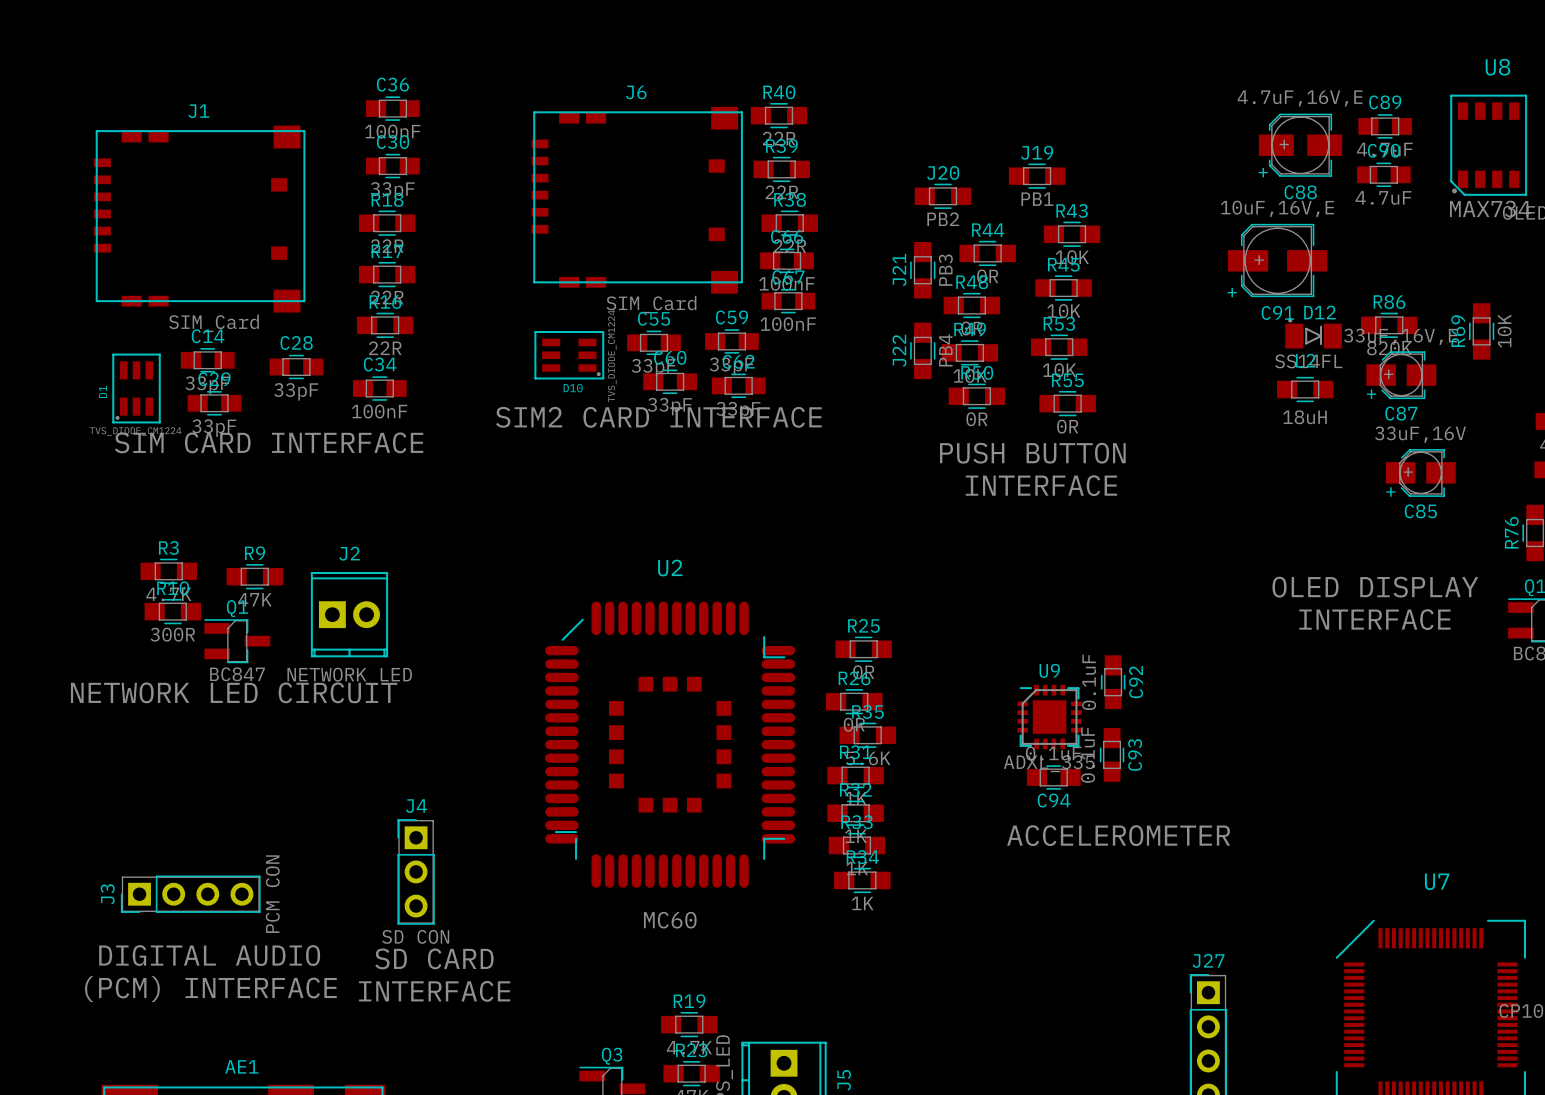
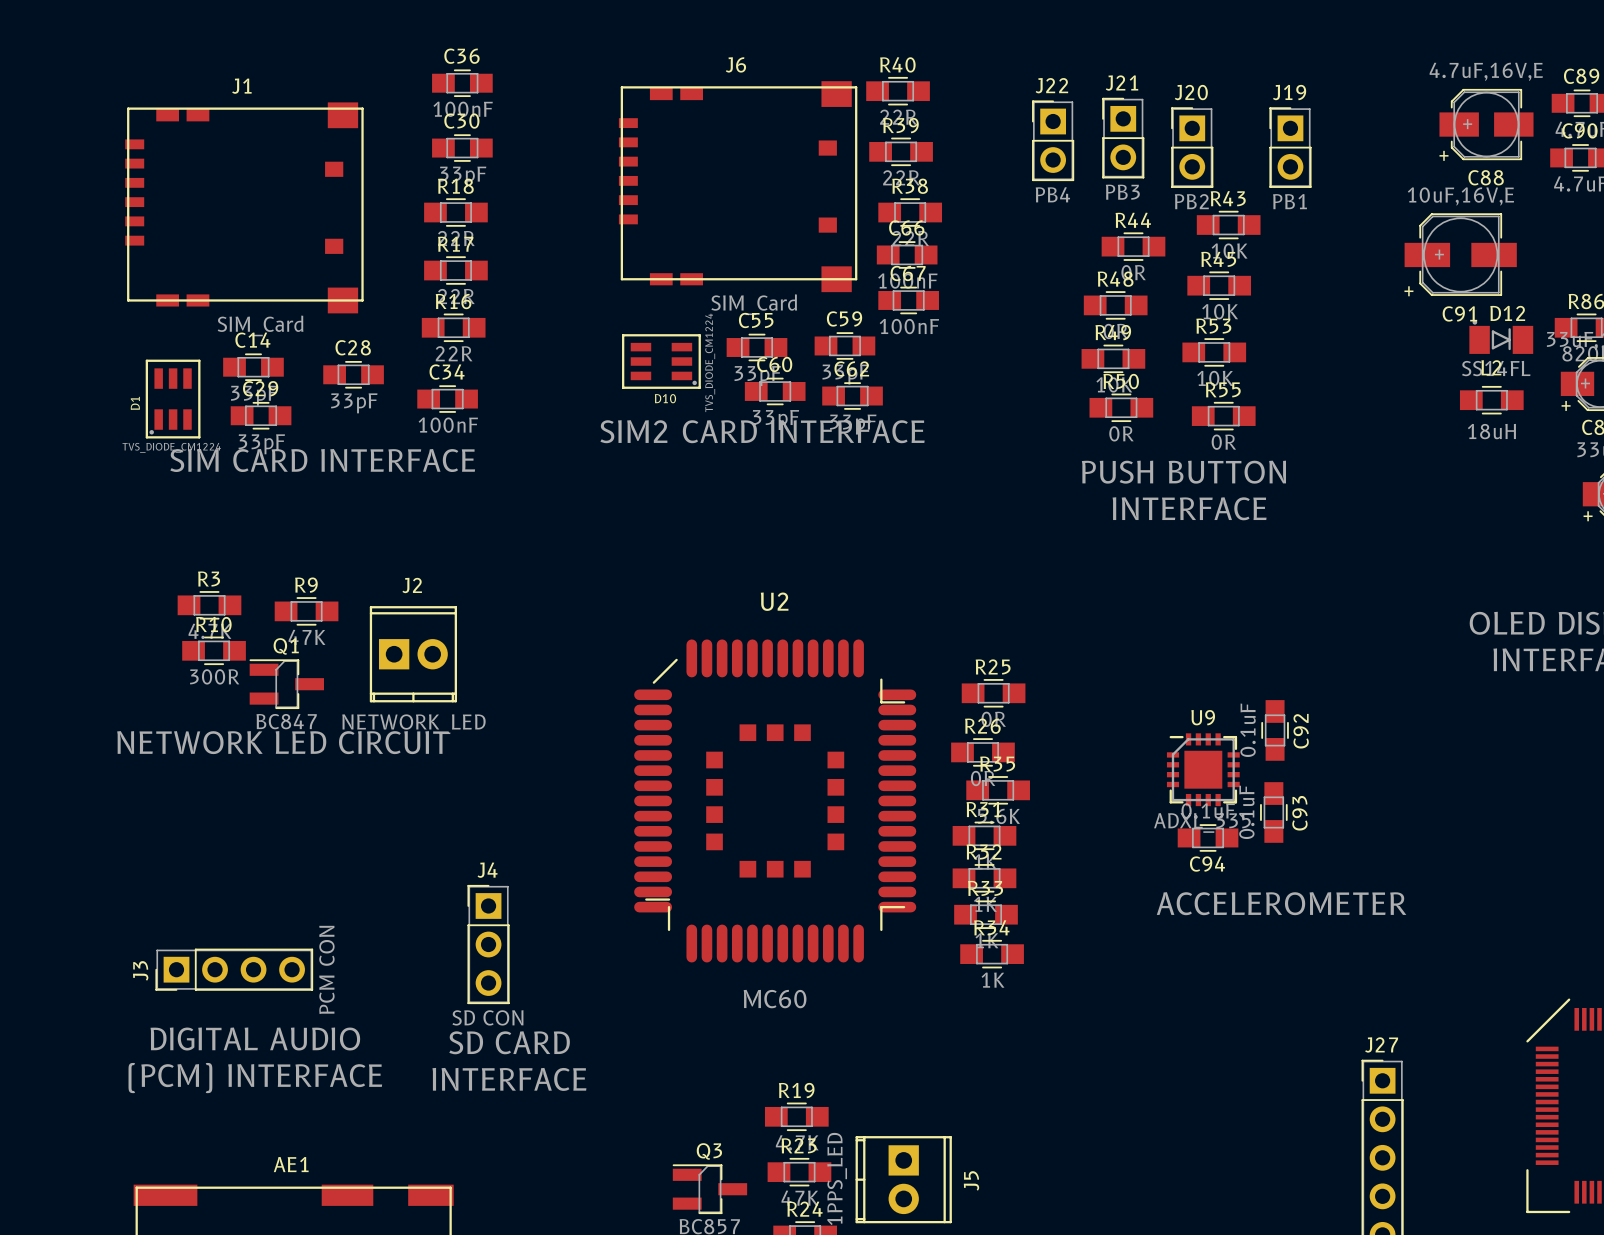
J19 footprint: [1008, 163, 1066, 189] -> [1269, 107, 1312, 188]
J20 footprint: [914, 183, 972, 209] -> [1171, 107, 1214, 188]
J21 footprint: [910, 242, 936, 299] -> [1102, 97, 1145, 179]
J21 name position: J21 (899, 269) -> J21 (1122, 83)
J21 value position: PB3 (945, 270) -> PB3 (1122, 192)
J22 footprint: [910, 322, 936, 380] -> [1032, 100, 1075, 182]
J22 name position: J22 (899, 350) -> J22 (1051, 85)
J22 value position: PB4 (945, 350) -> PB4 (1052, 194)

